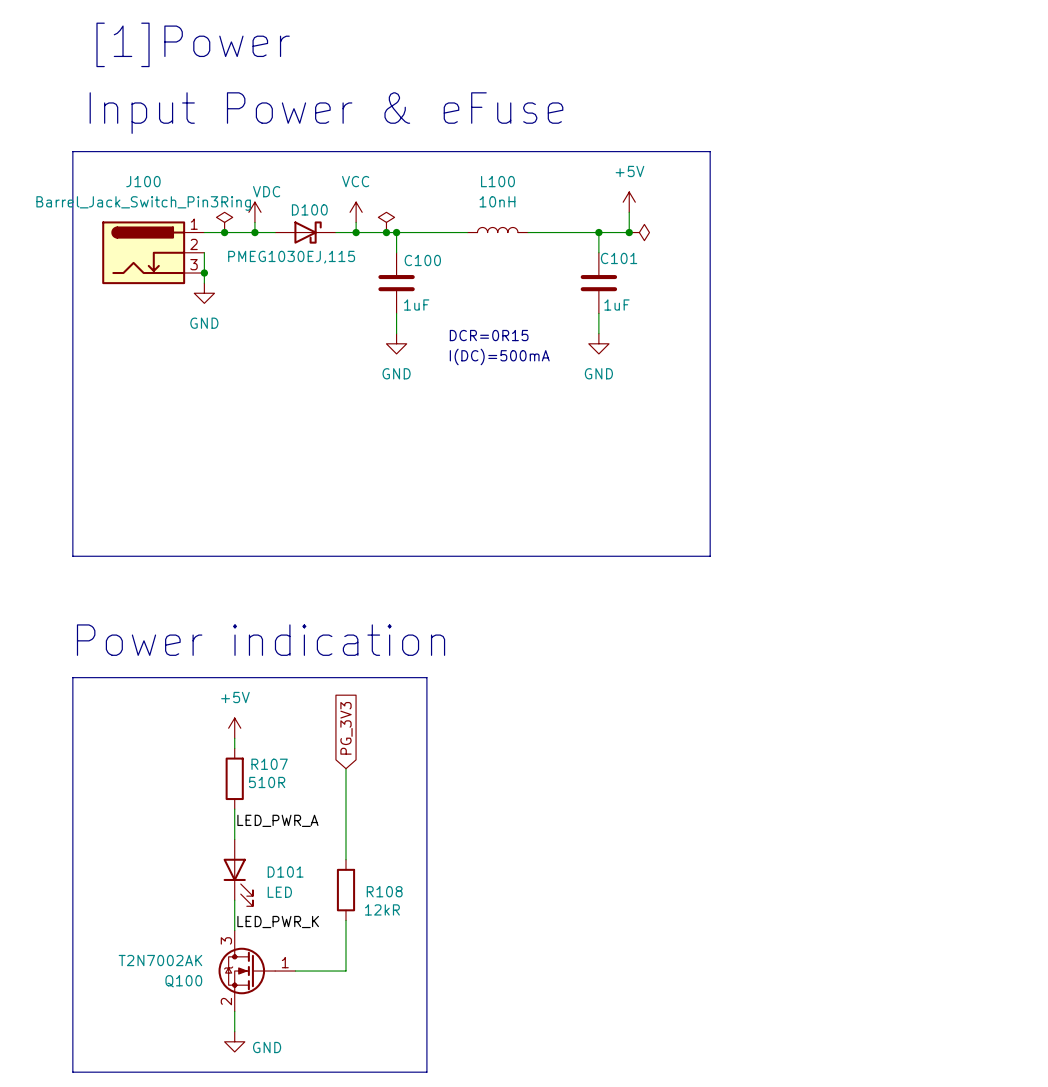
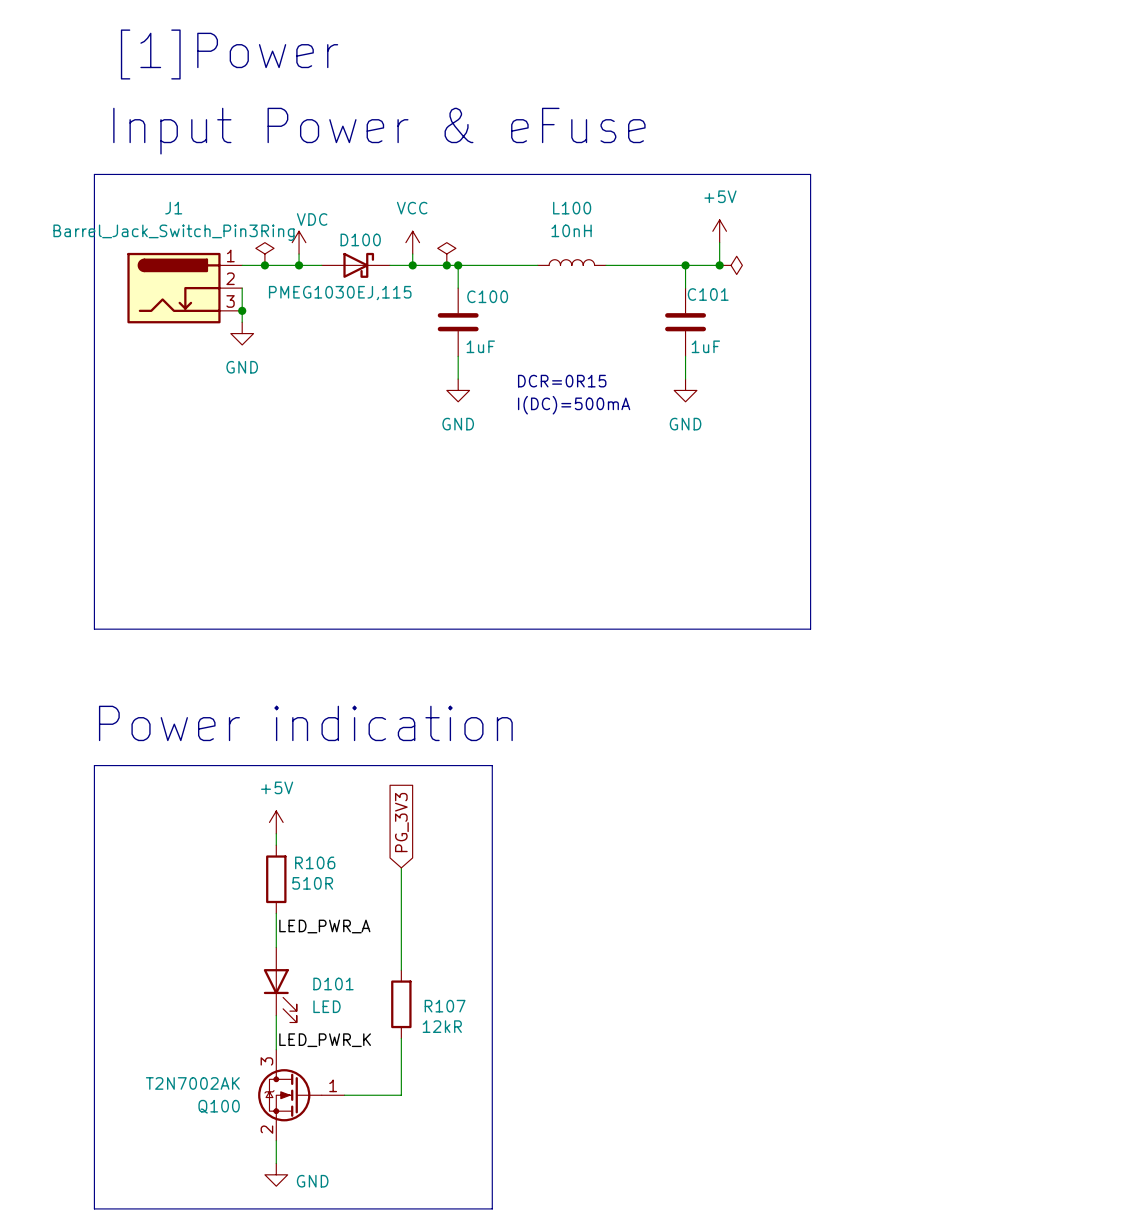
J100 name: J100 (143, 181) -> J1 (173, 208)
R107 name: R107 (269, 764) -> R106 (315, 862)
R108 name: R108 (384, 891) -> R107 (445, 1006)

